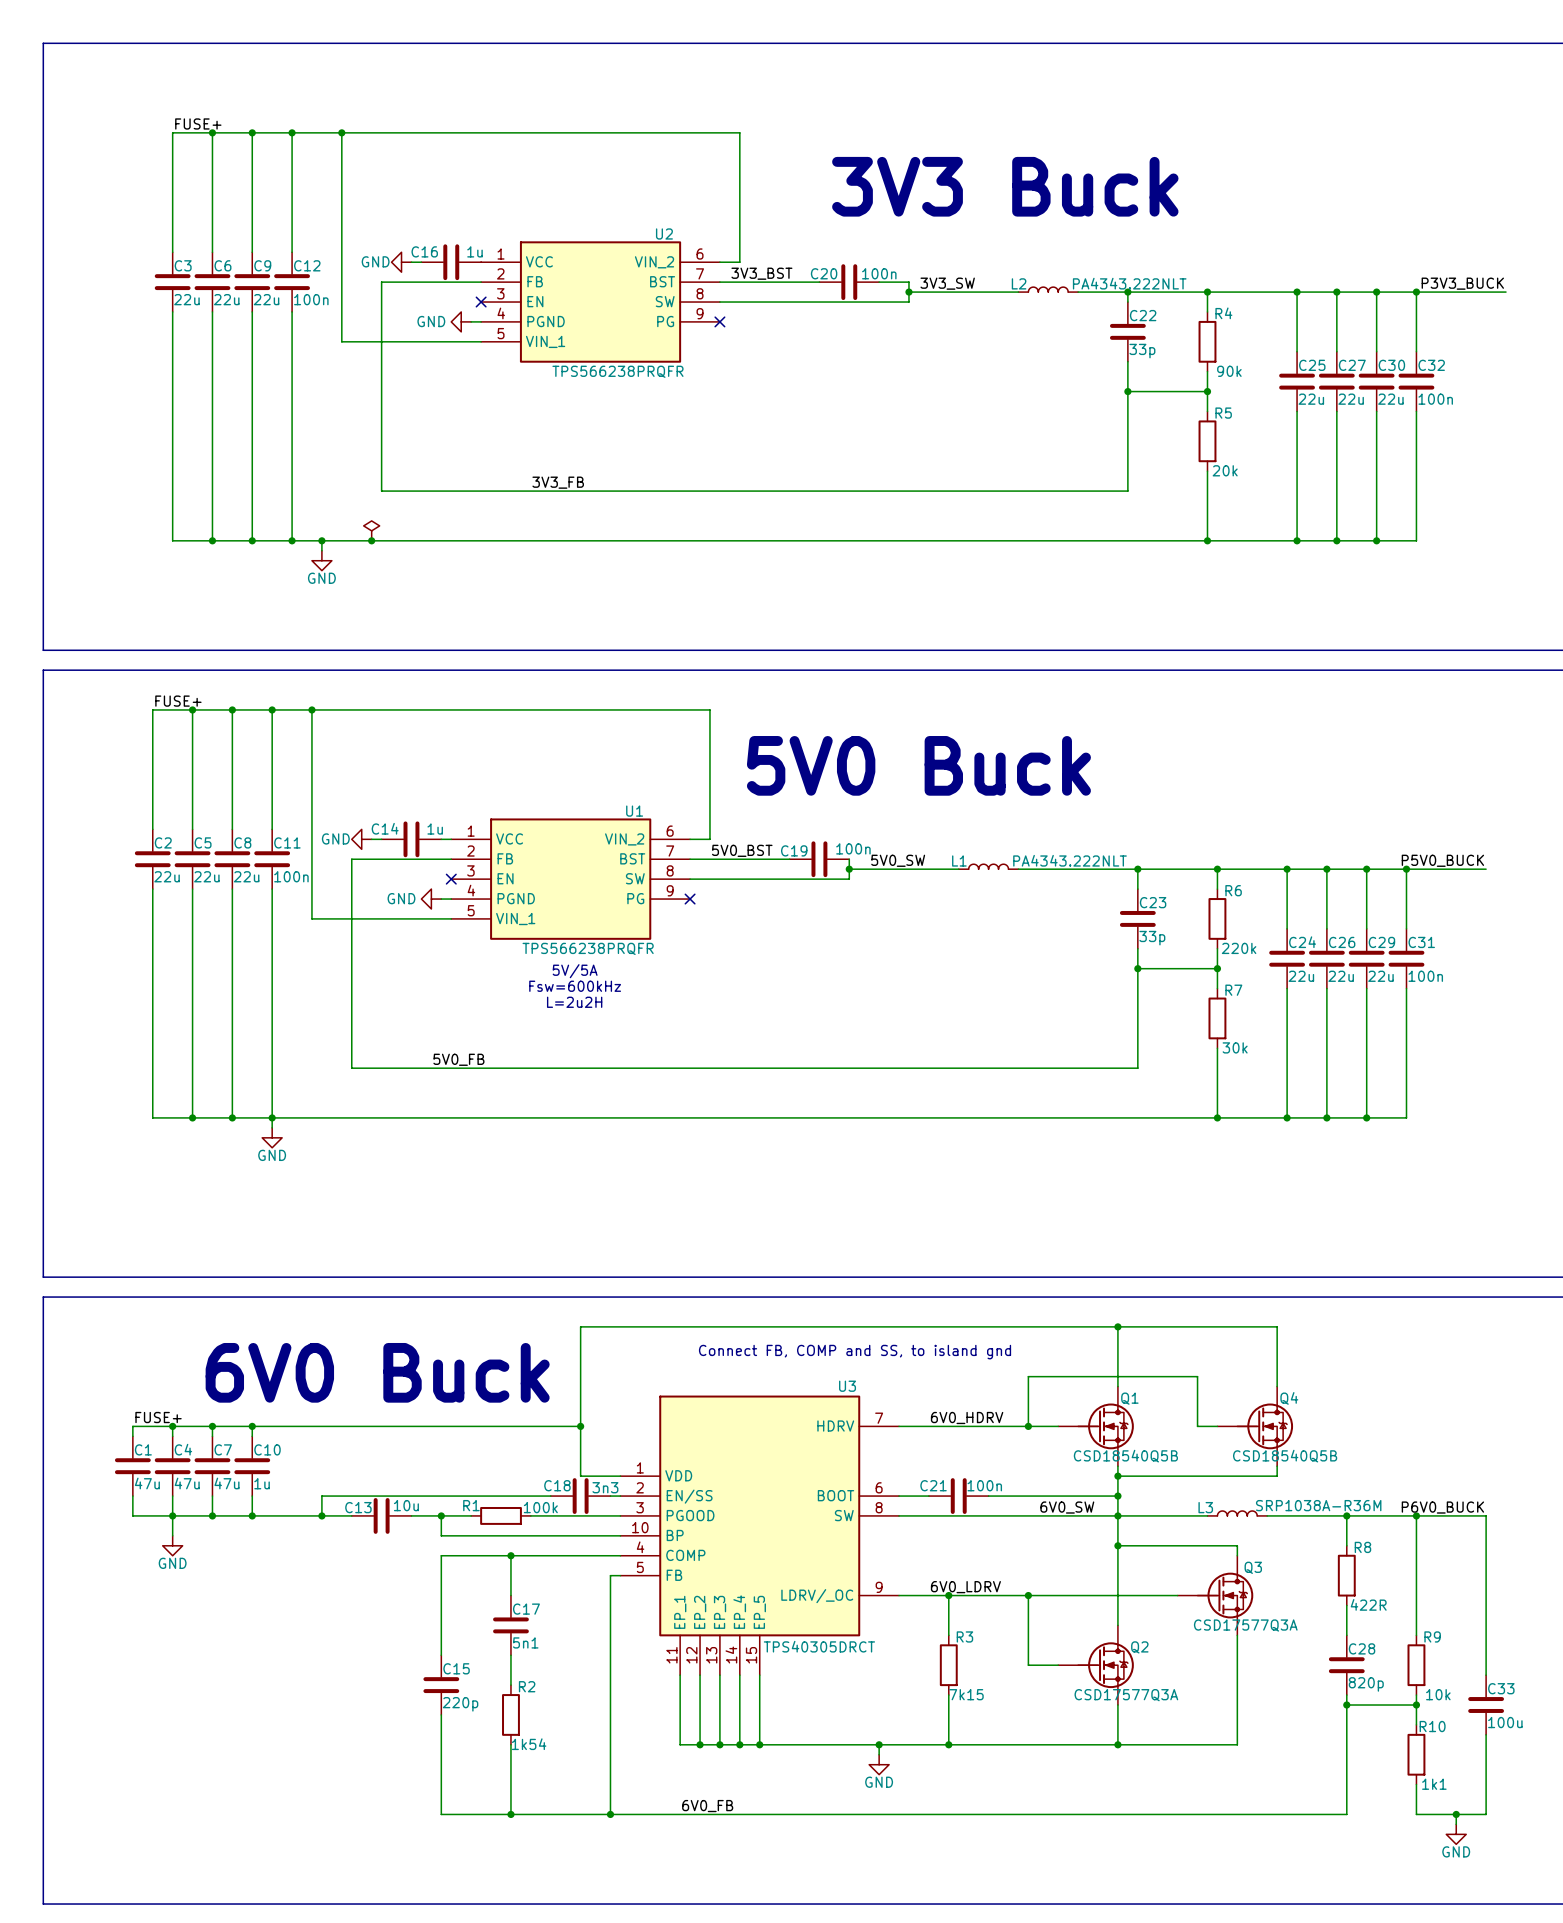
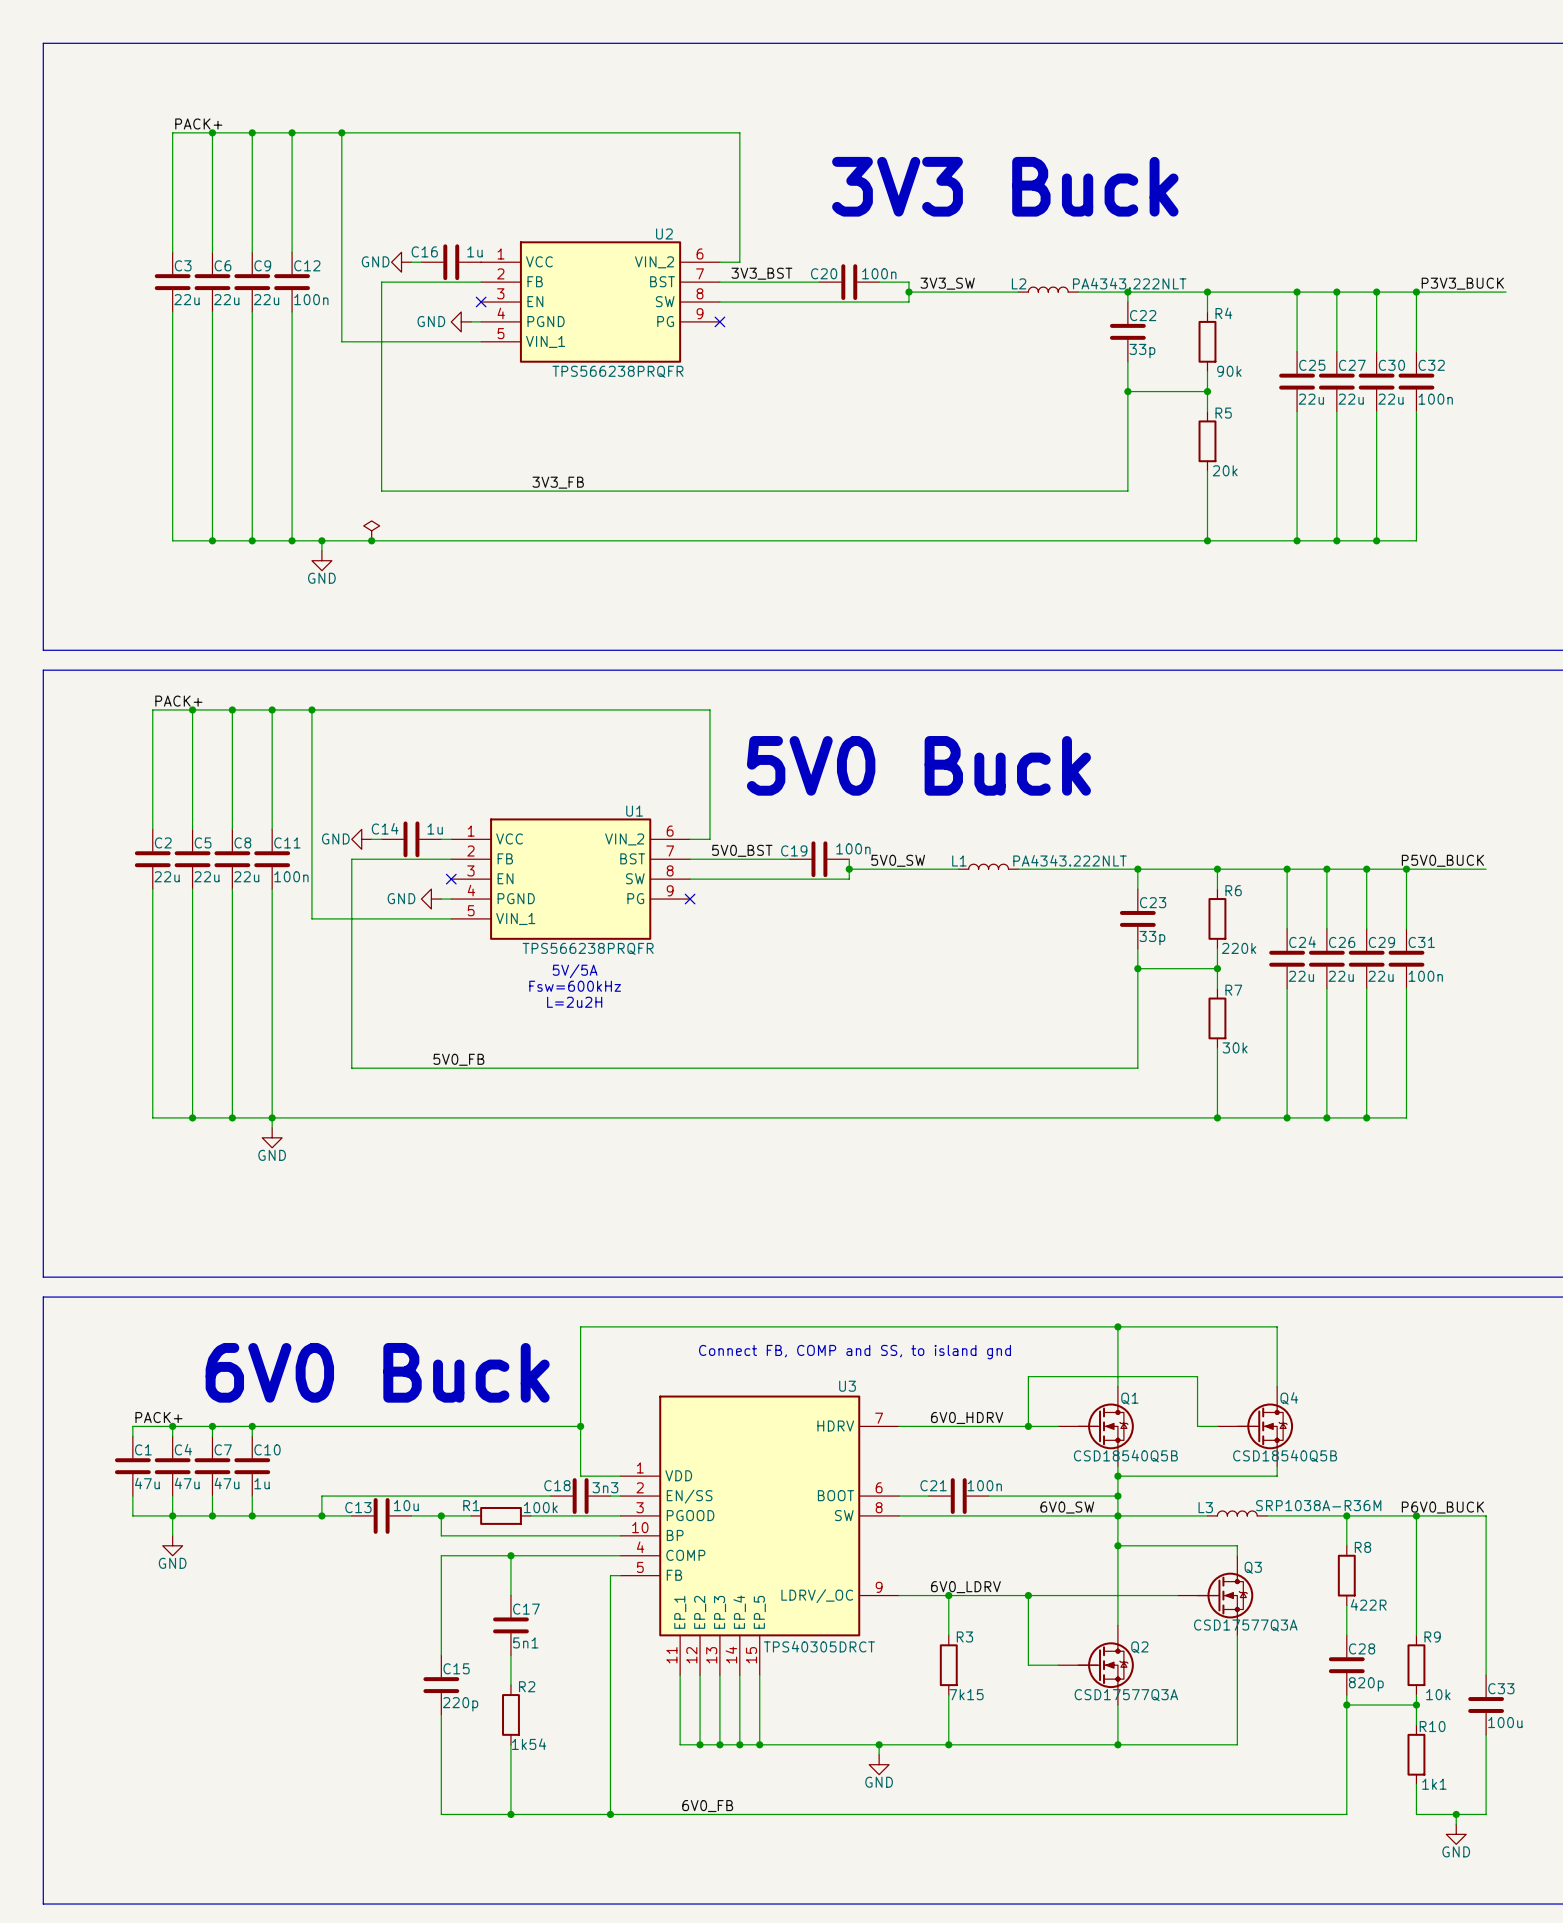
label: FUSE+ (198, 123) -> PACK+ (198, 123)
label: FUSE+ (178, 701) -> PACK+ (178, 701)
label: FUSE+ (158, 1417) -> PACK+ (159, 1417)

